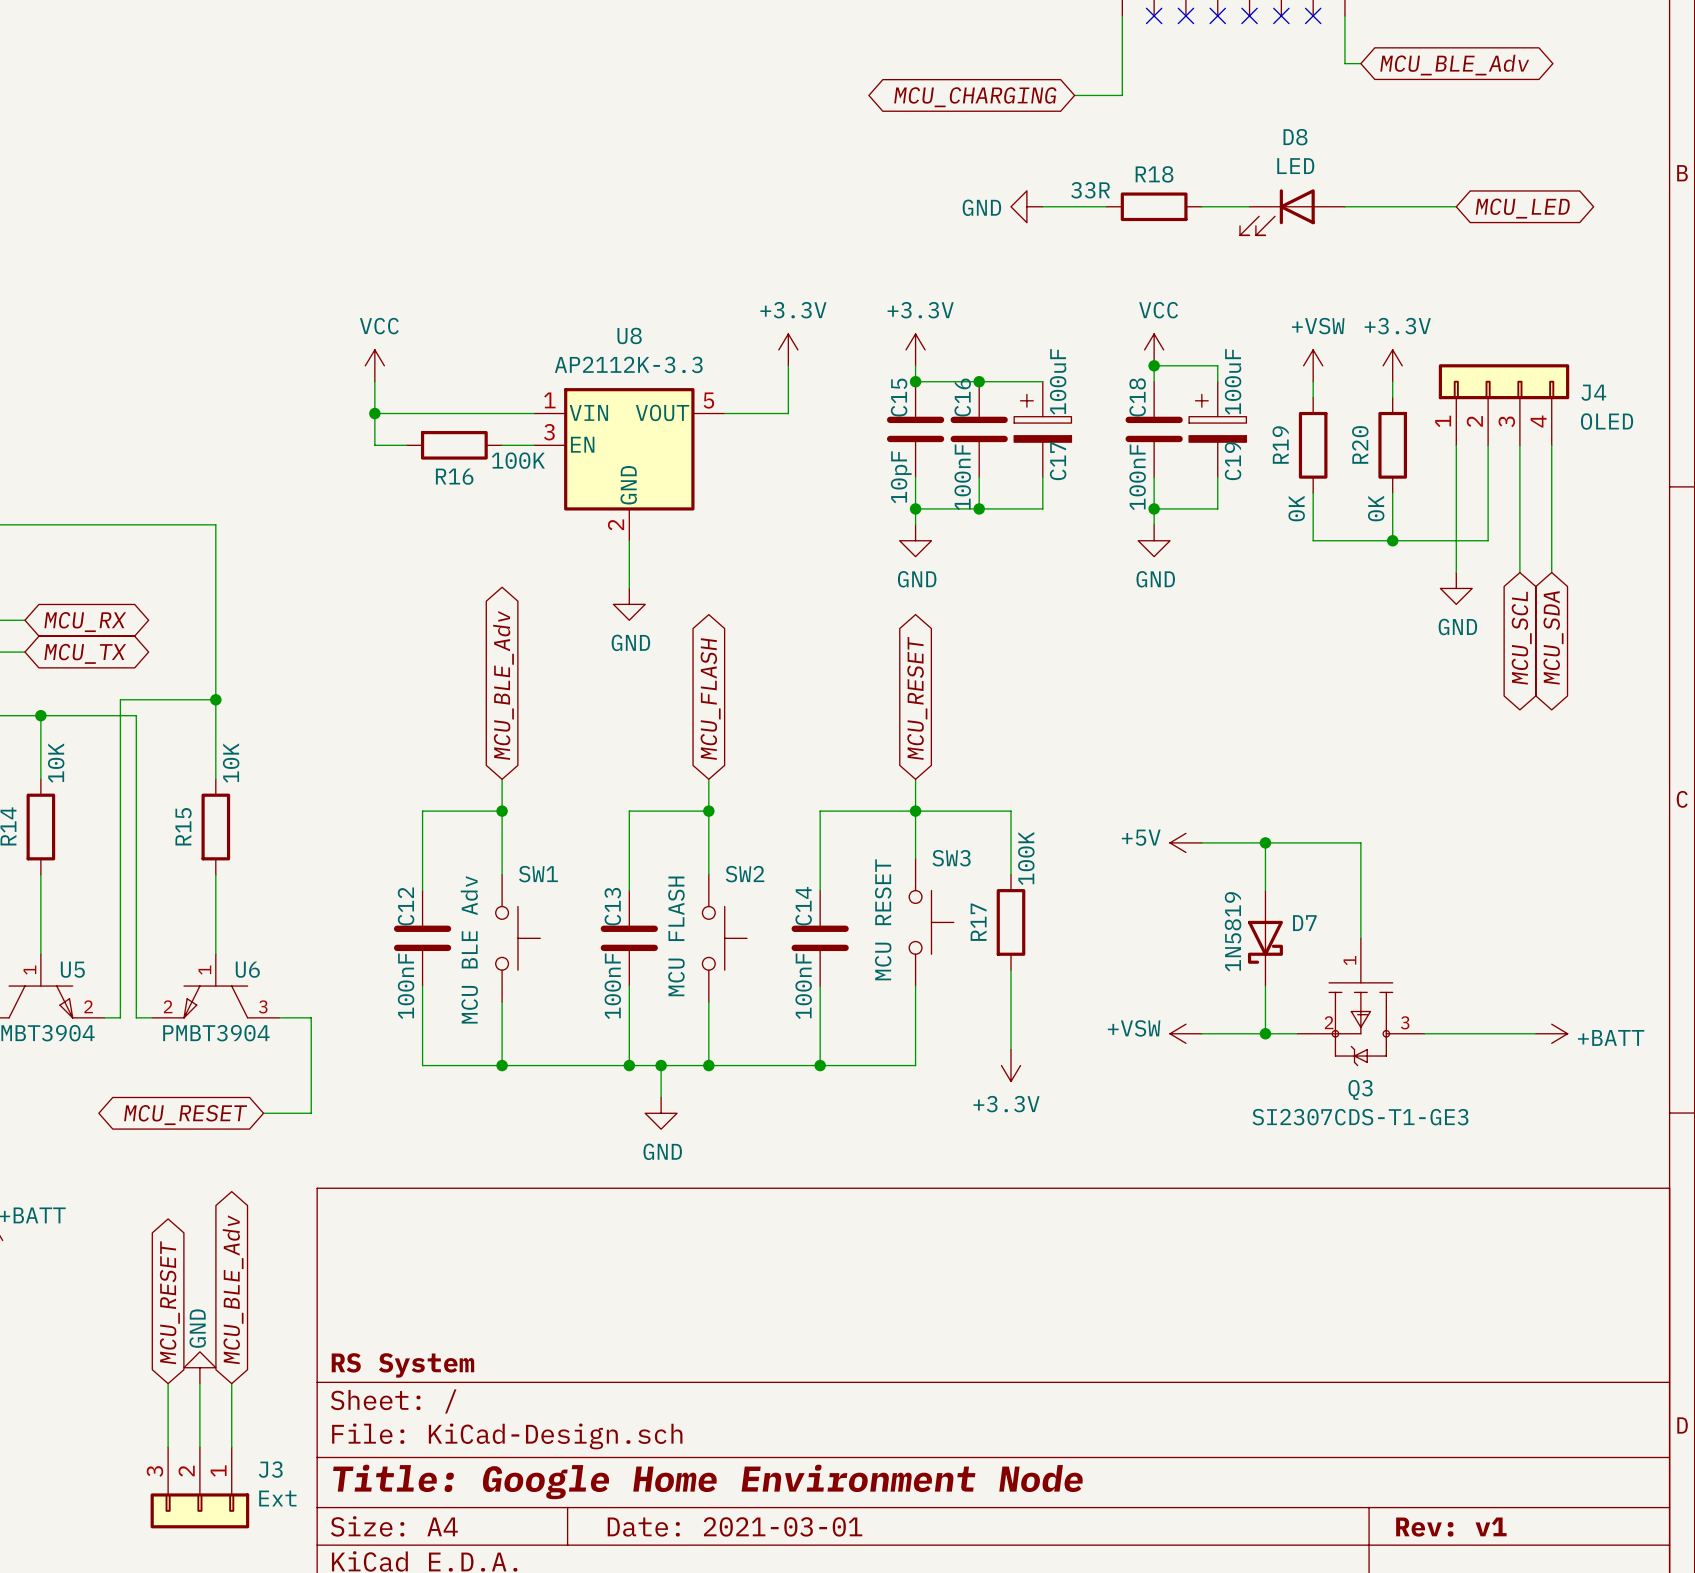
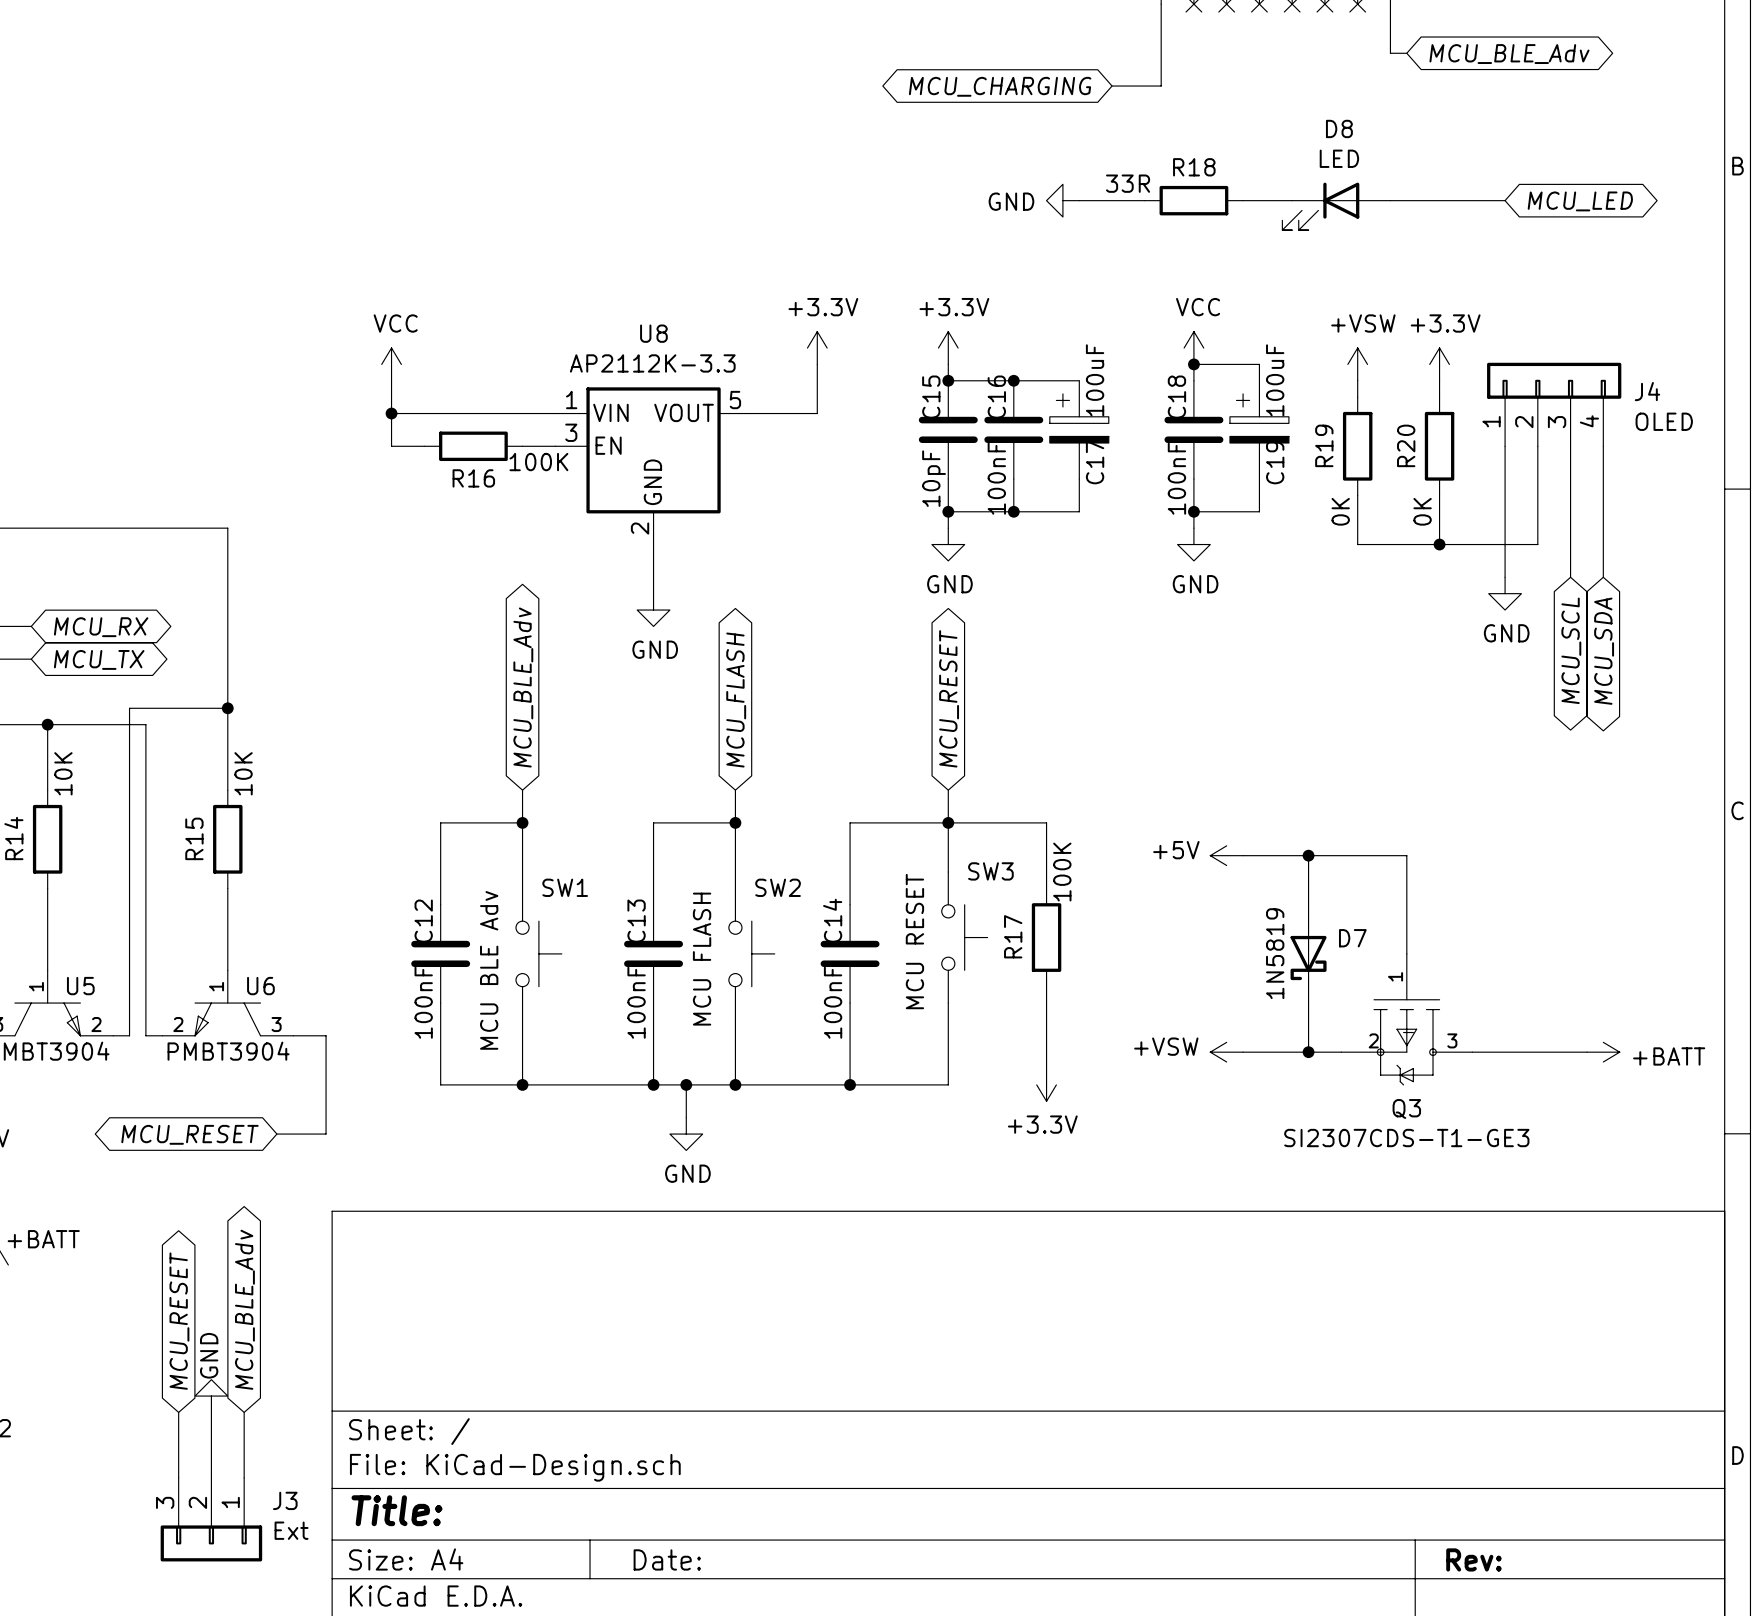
title block: RS System (402, 1365) -> none
title block: Title: Google Home Environment Node (708, 1481) -> Title: (397, 1510)
title block: Date: 2021-03-01 (734, 1526) -> Date: (667, 1559)
title block: Rev: v1 (1451, 1527) -> Rev: (1473, 1559)

